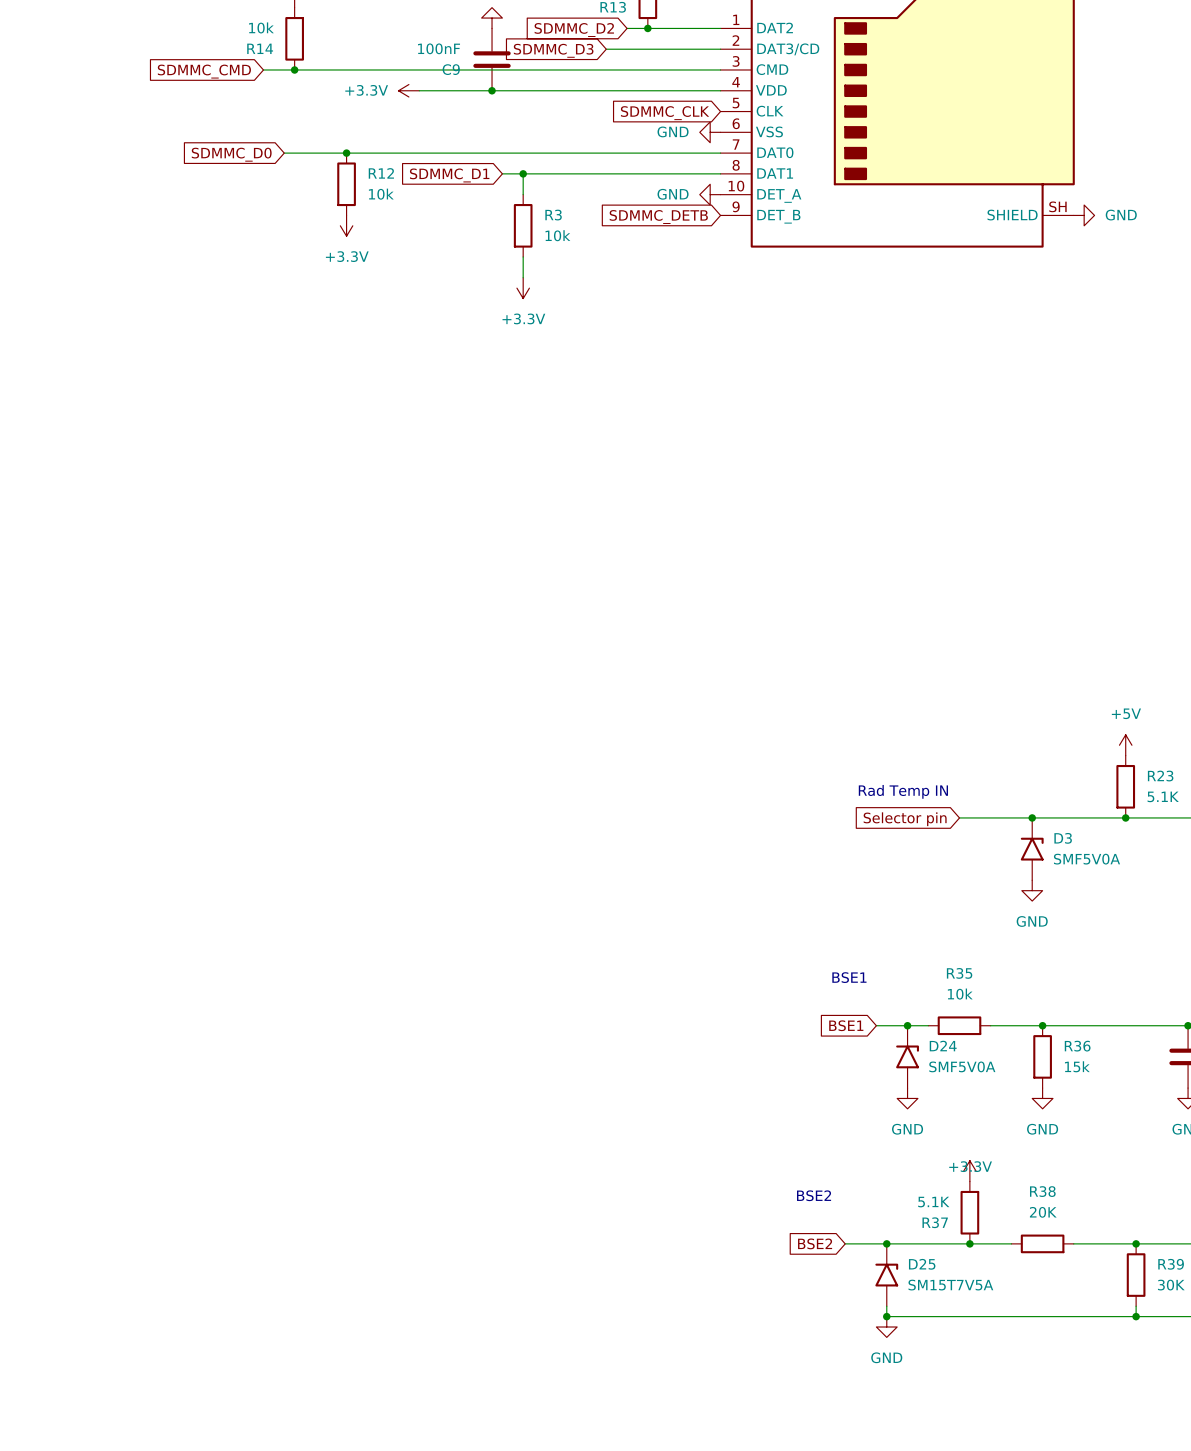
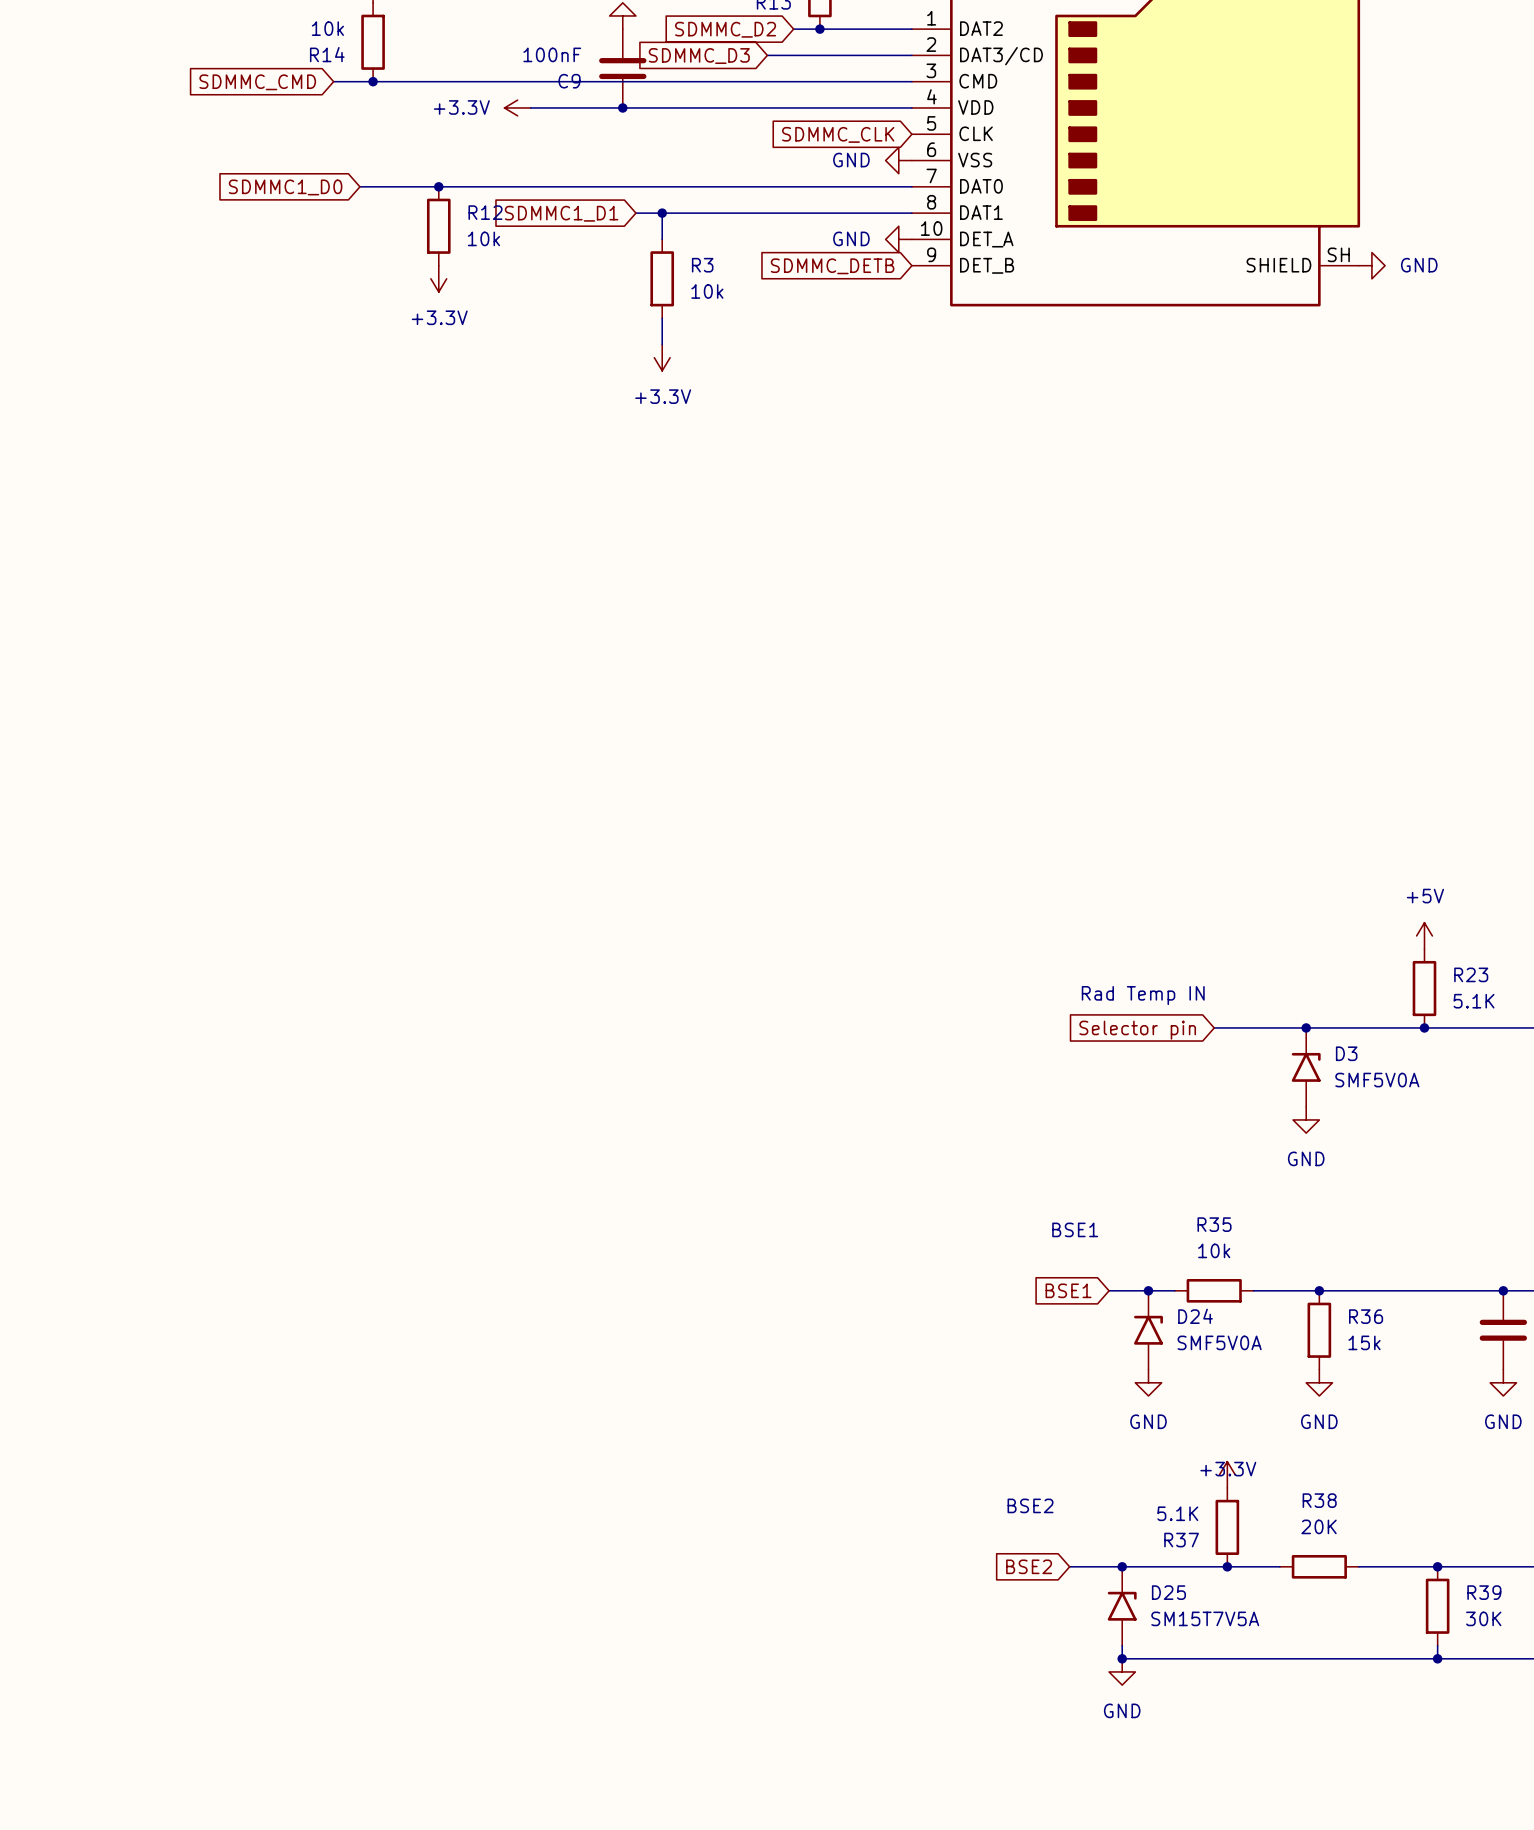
global label: SDMMC_D0 (231, 154) -> SDMMC1_D0 (285, 187)
global label: SDMMC_D1 (449, 175) -> SDMMC1_D1 (561, 213)

